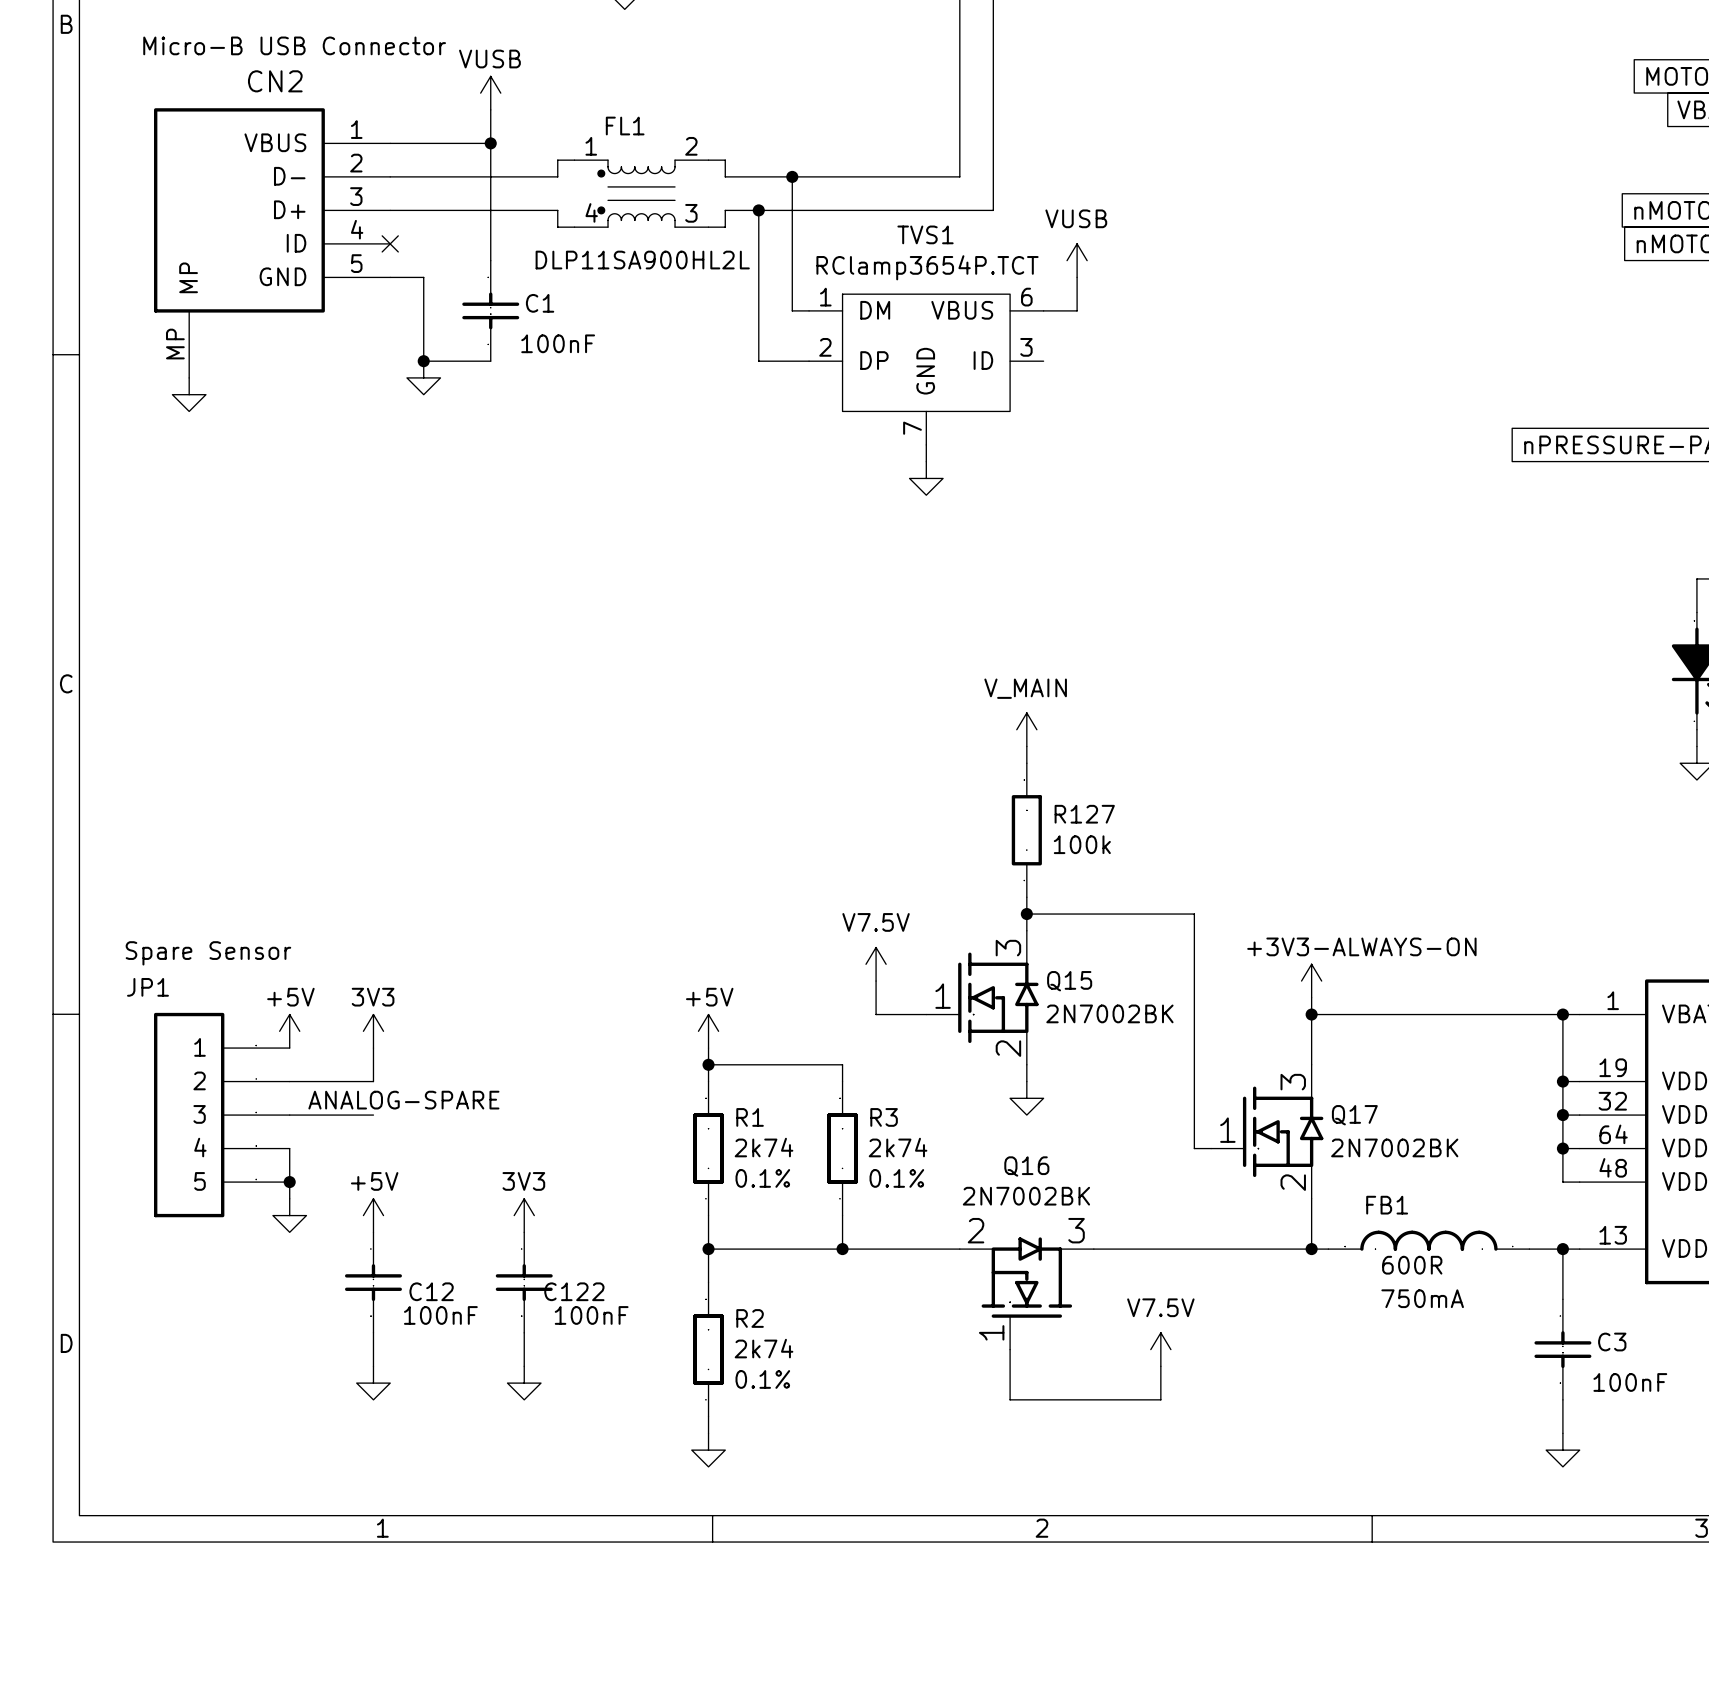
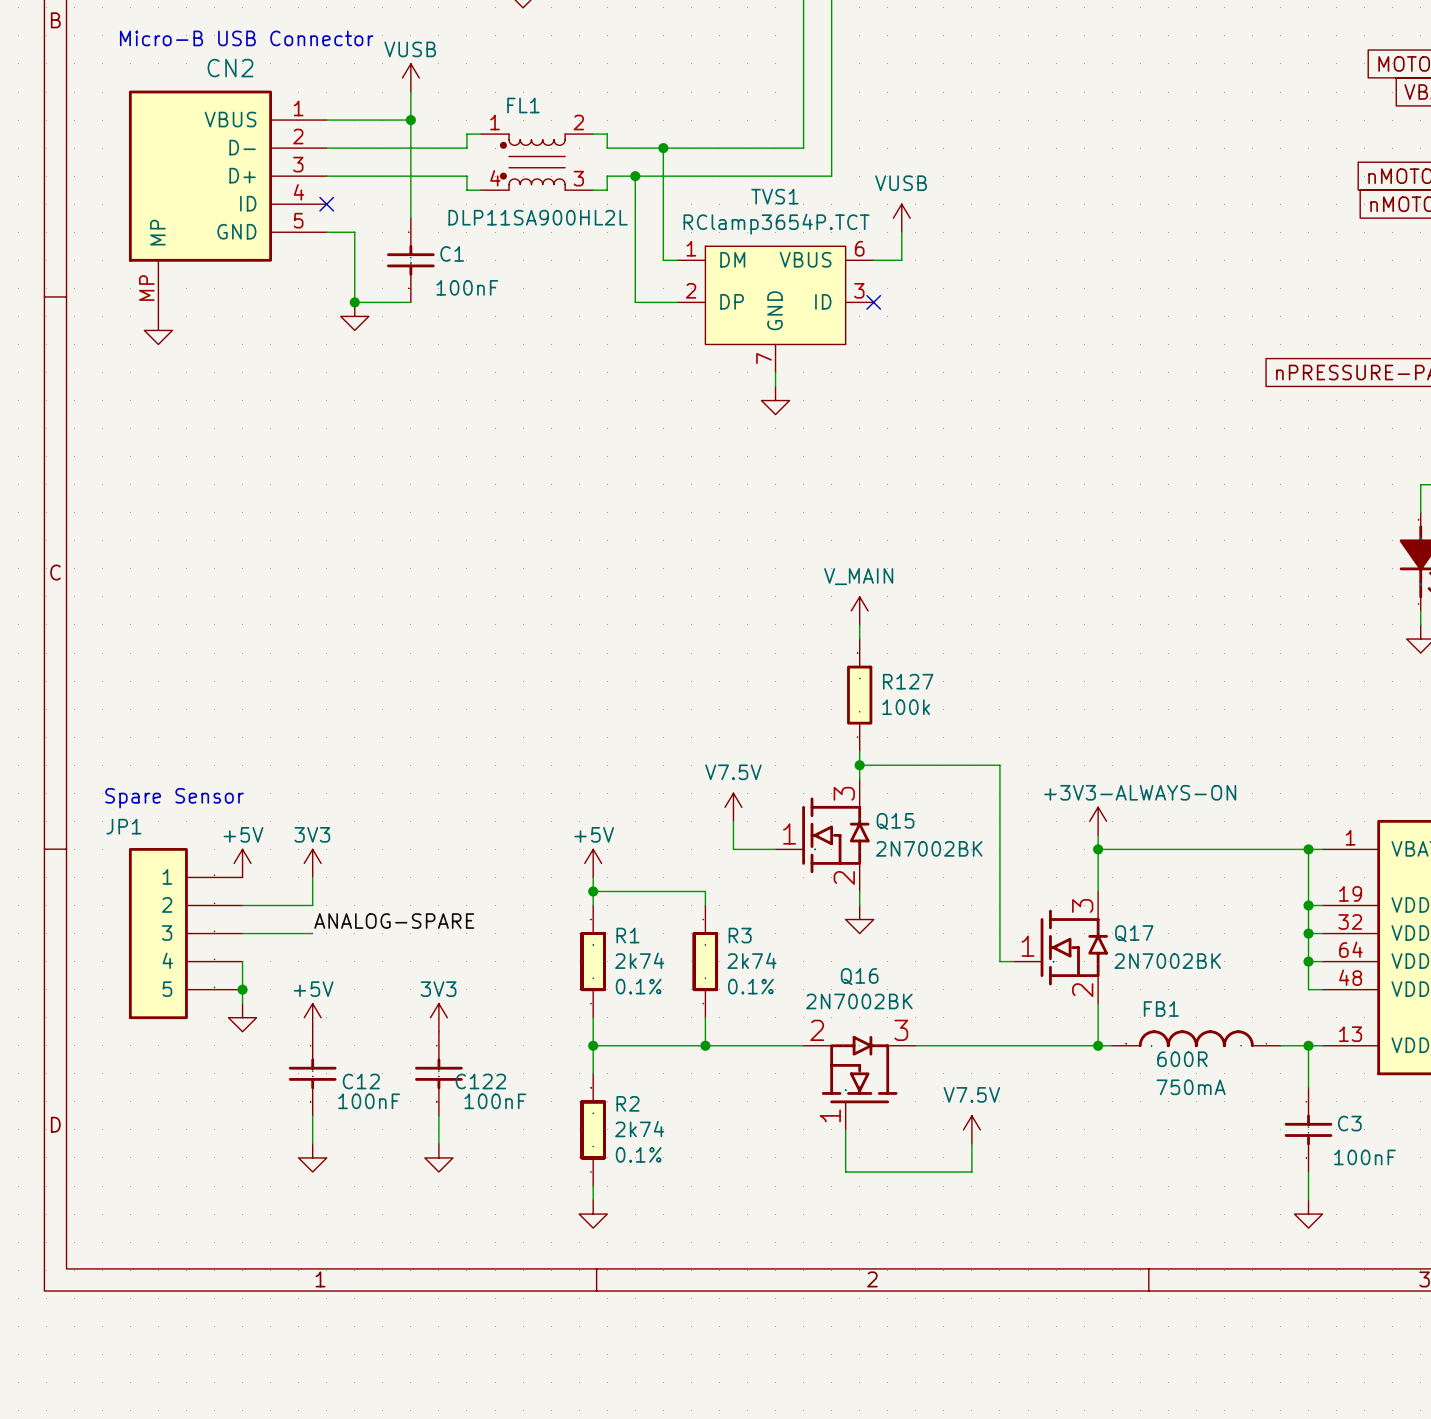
no-connect mark: none -> (873, 302)
label position: ANALOG-SPARE (403, 1100) -> ANALOG-SPARE (394, 921)

